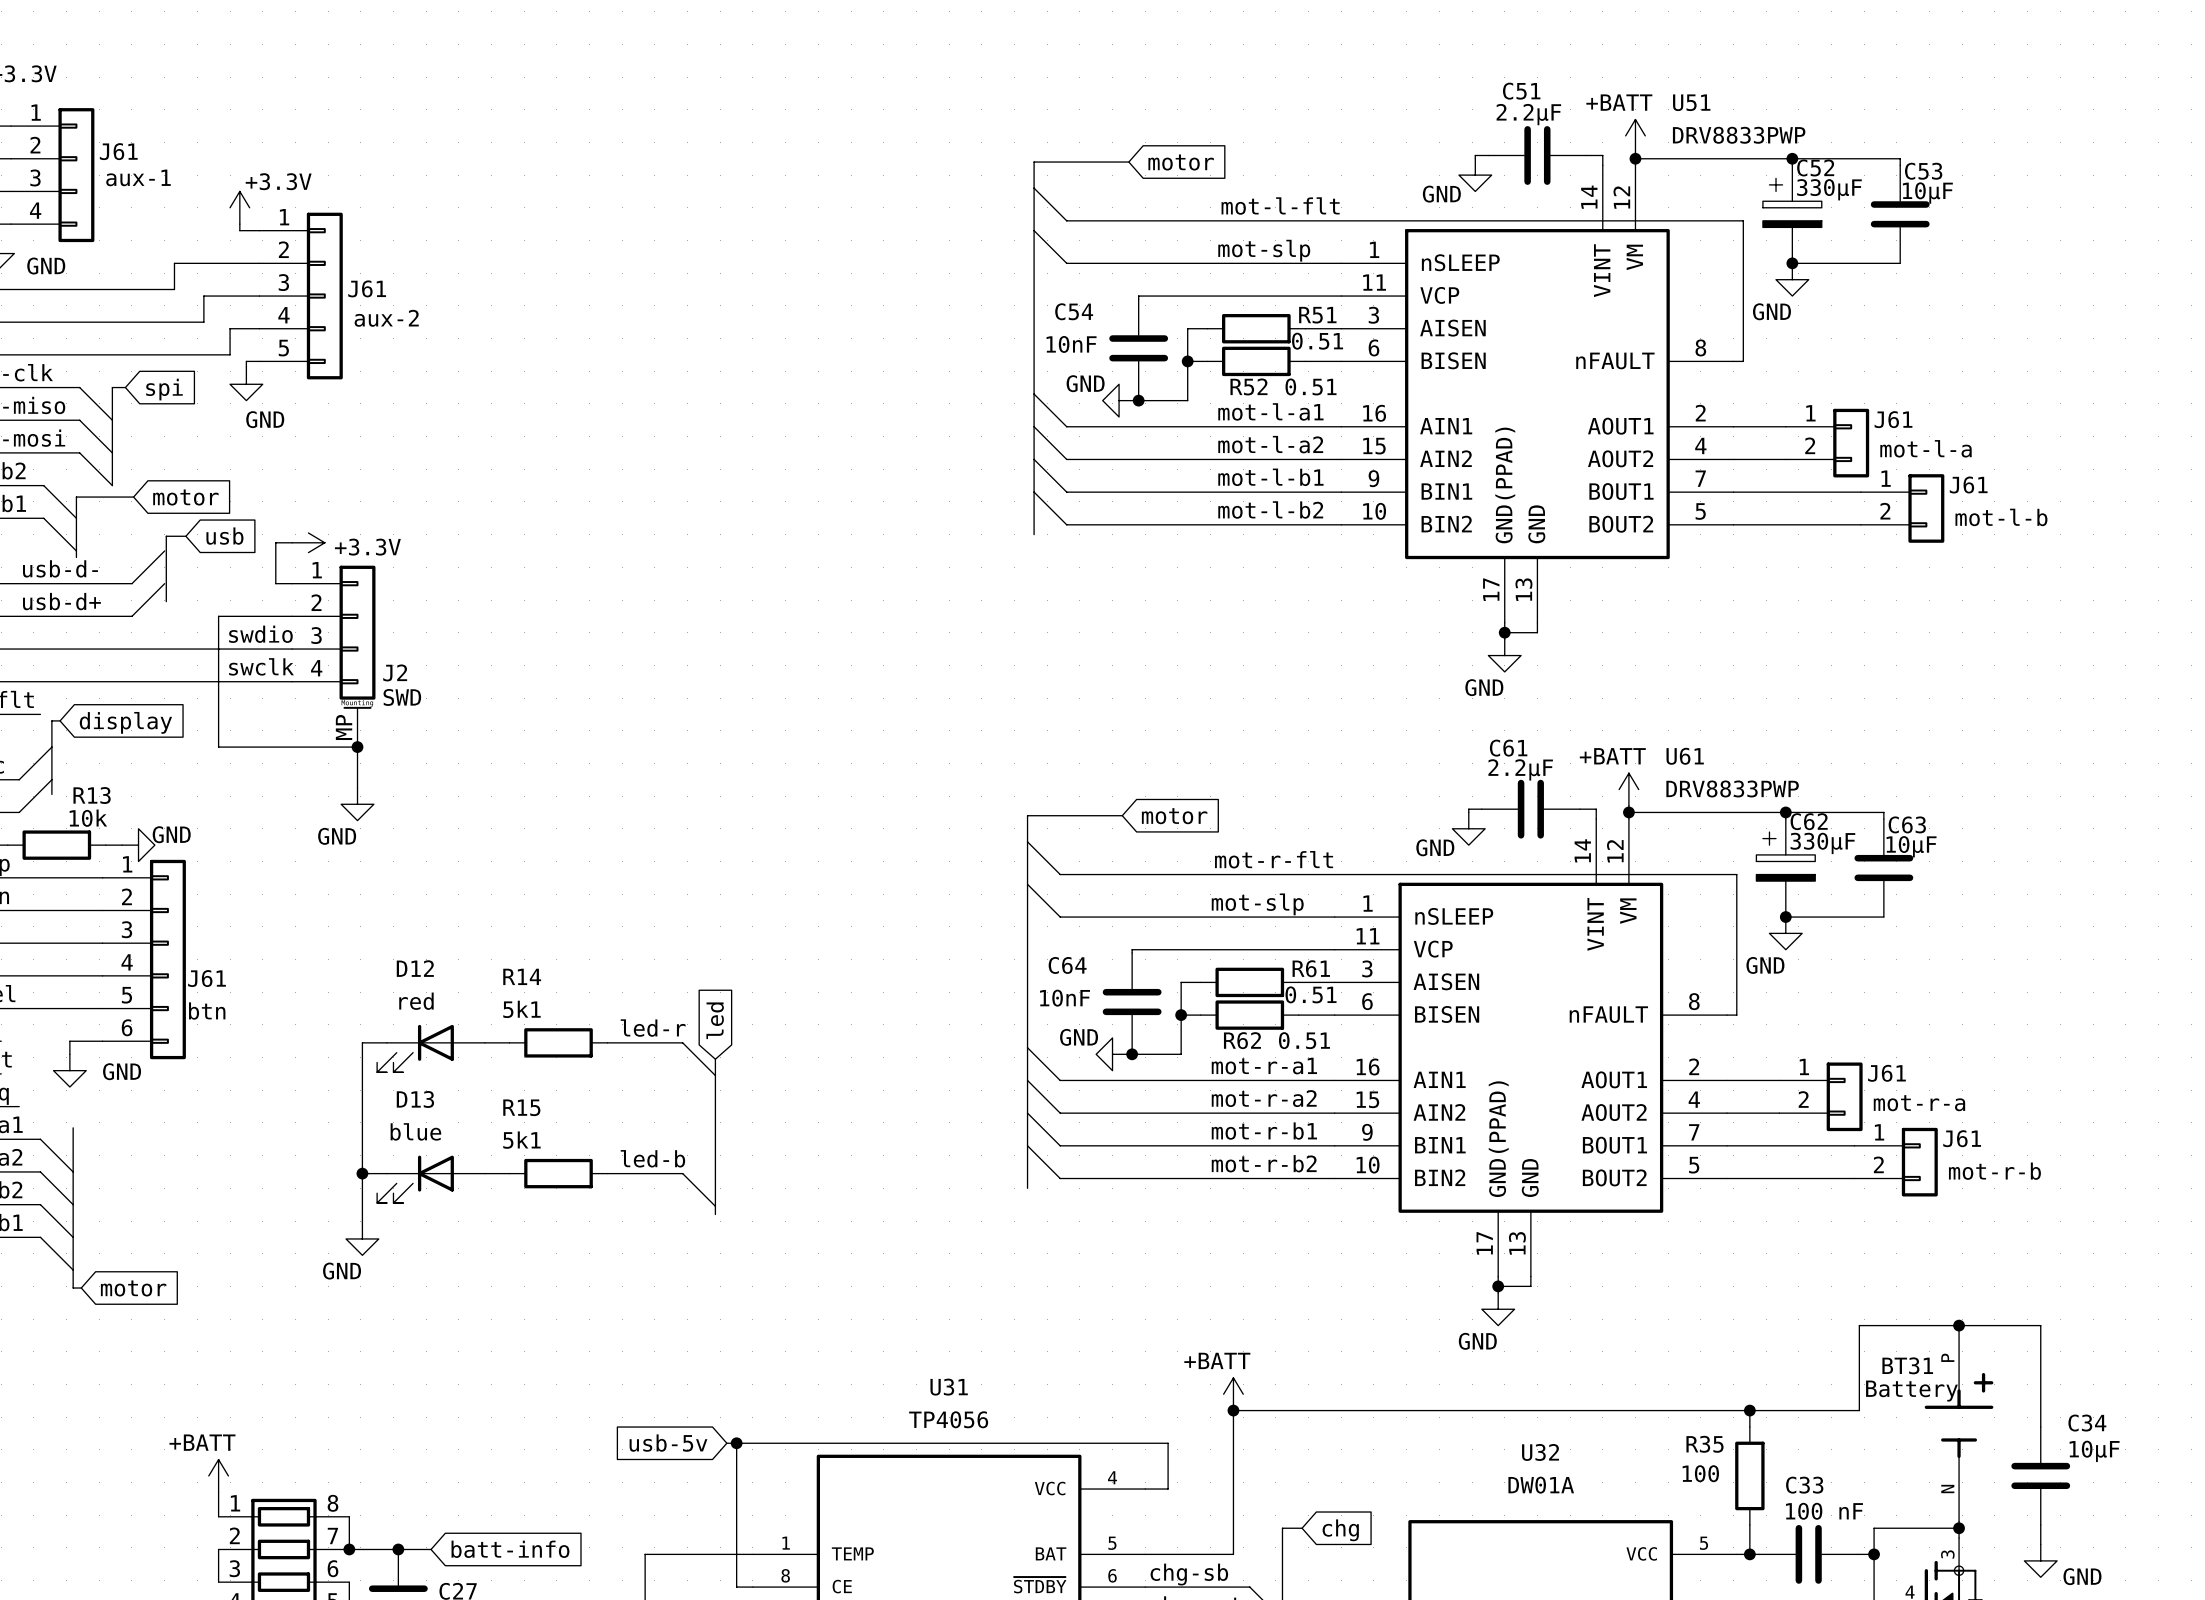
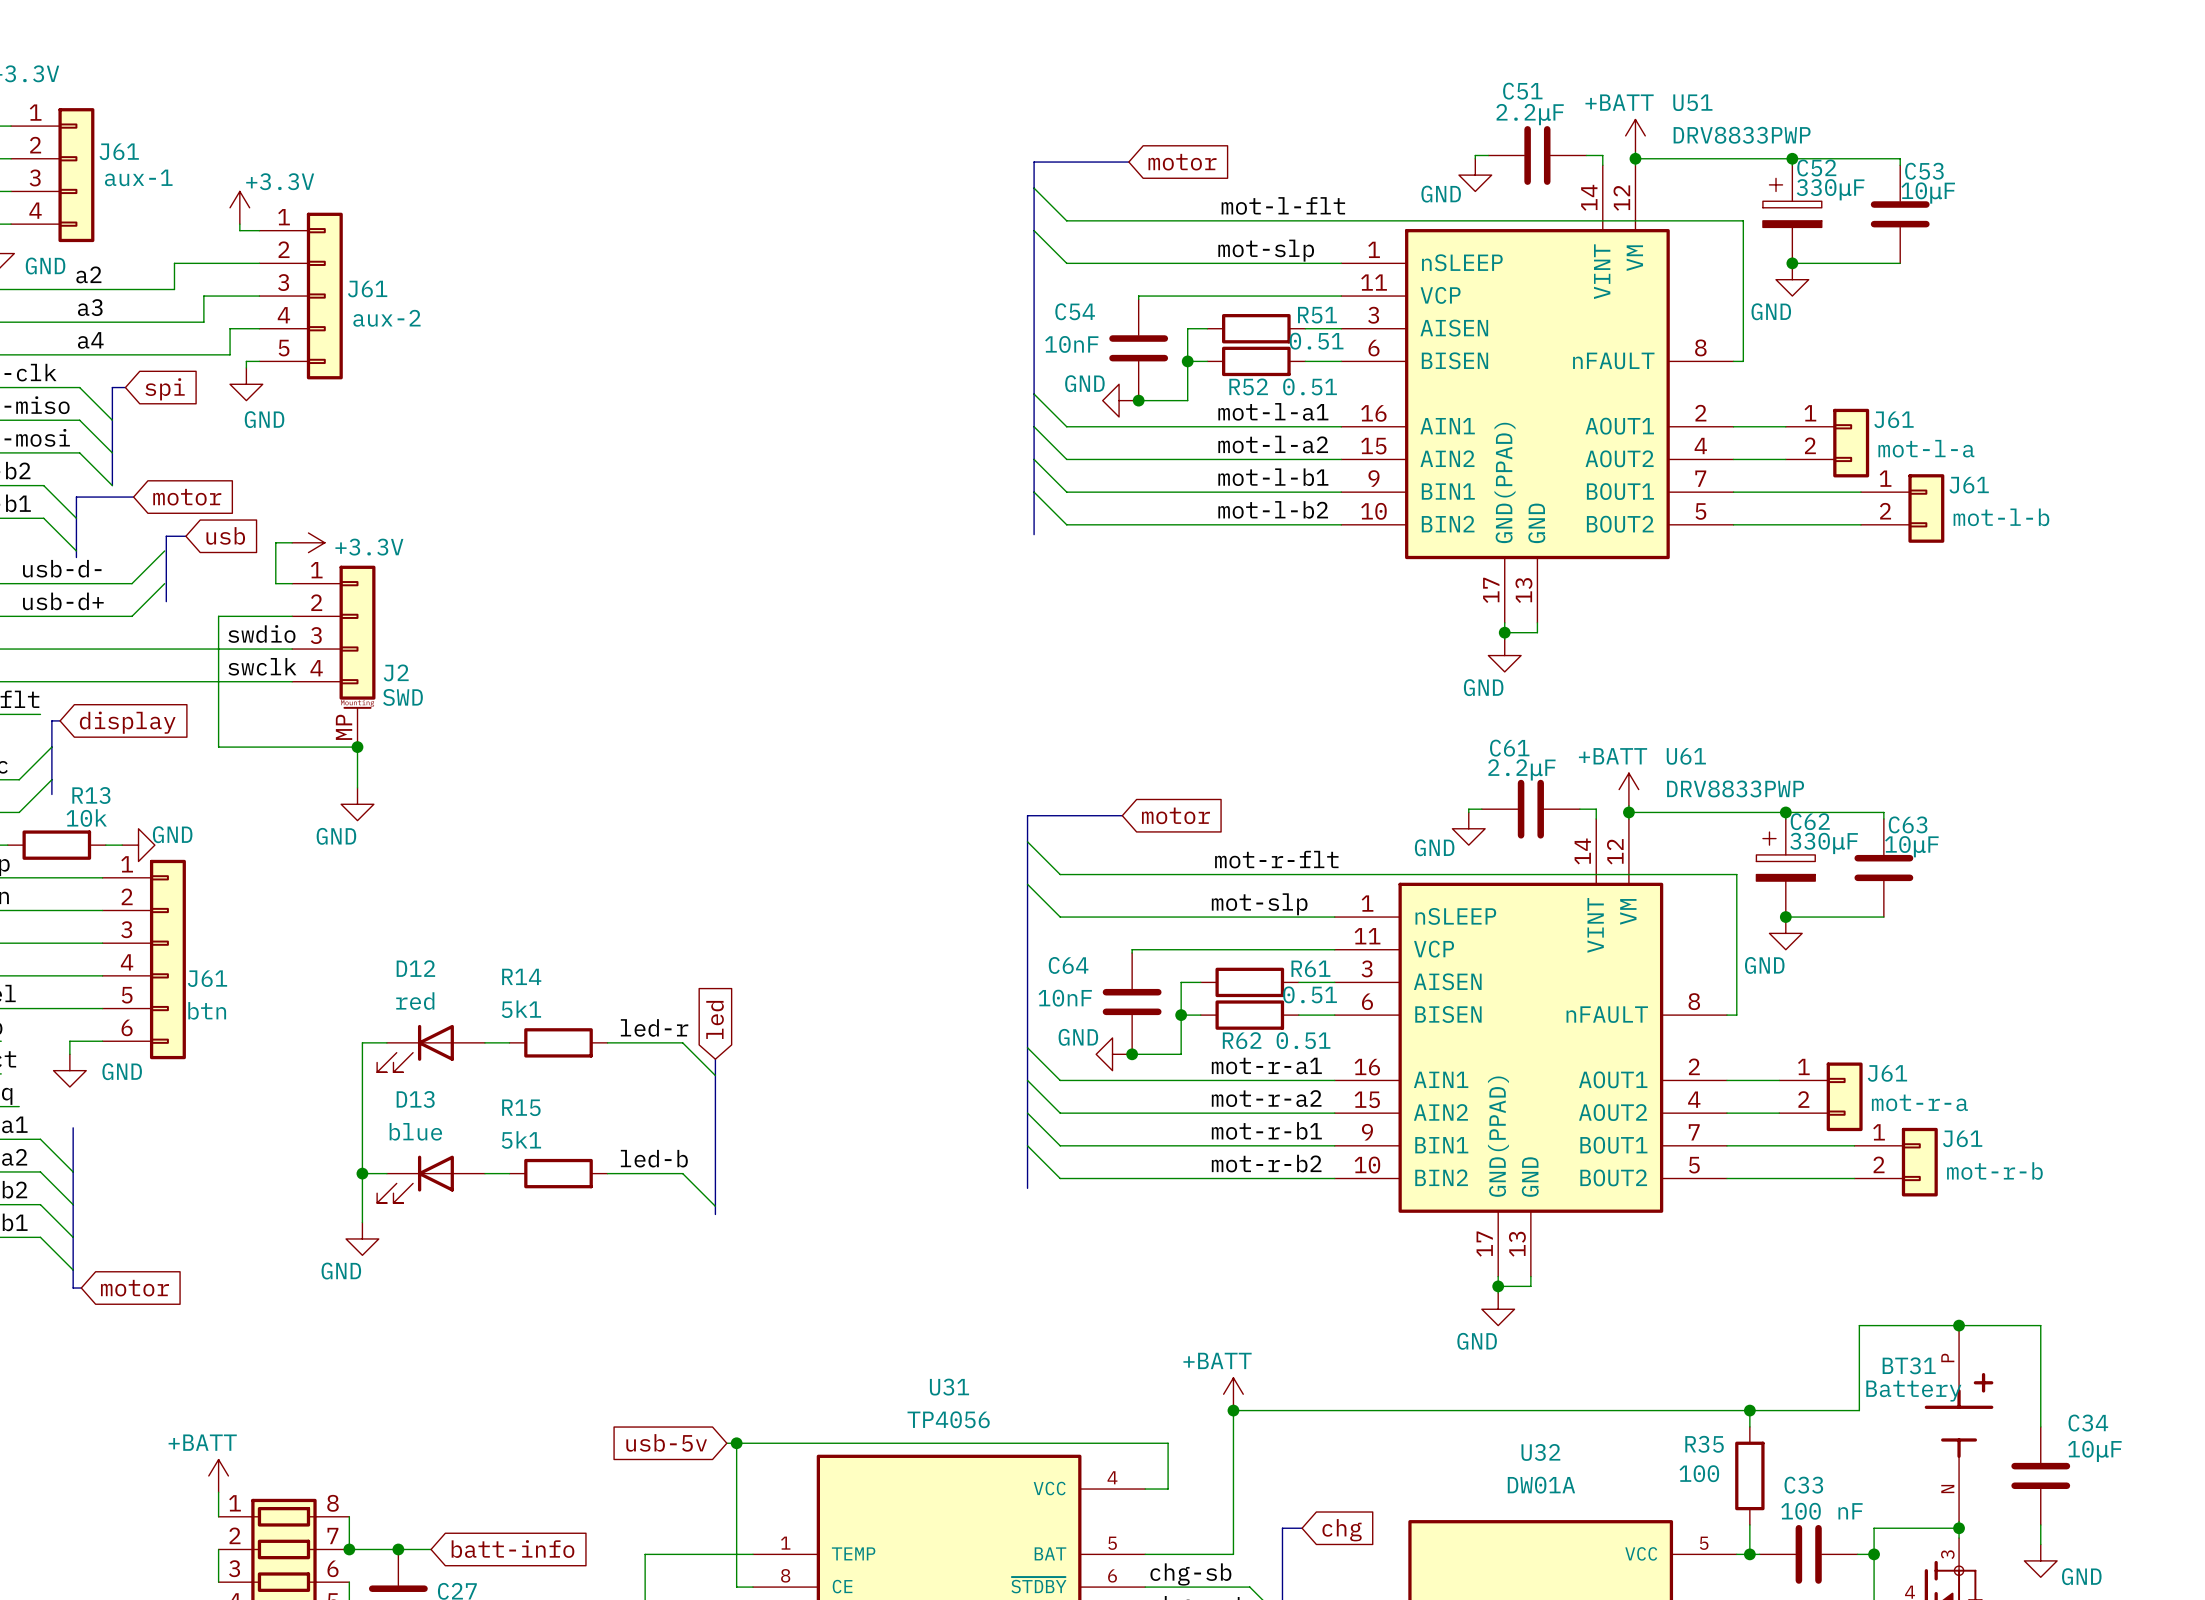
label: none -> a2 (88, 274)
label: none -> a3 (90, 307)
label: none -> a4 (90, 340)

